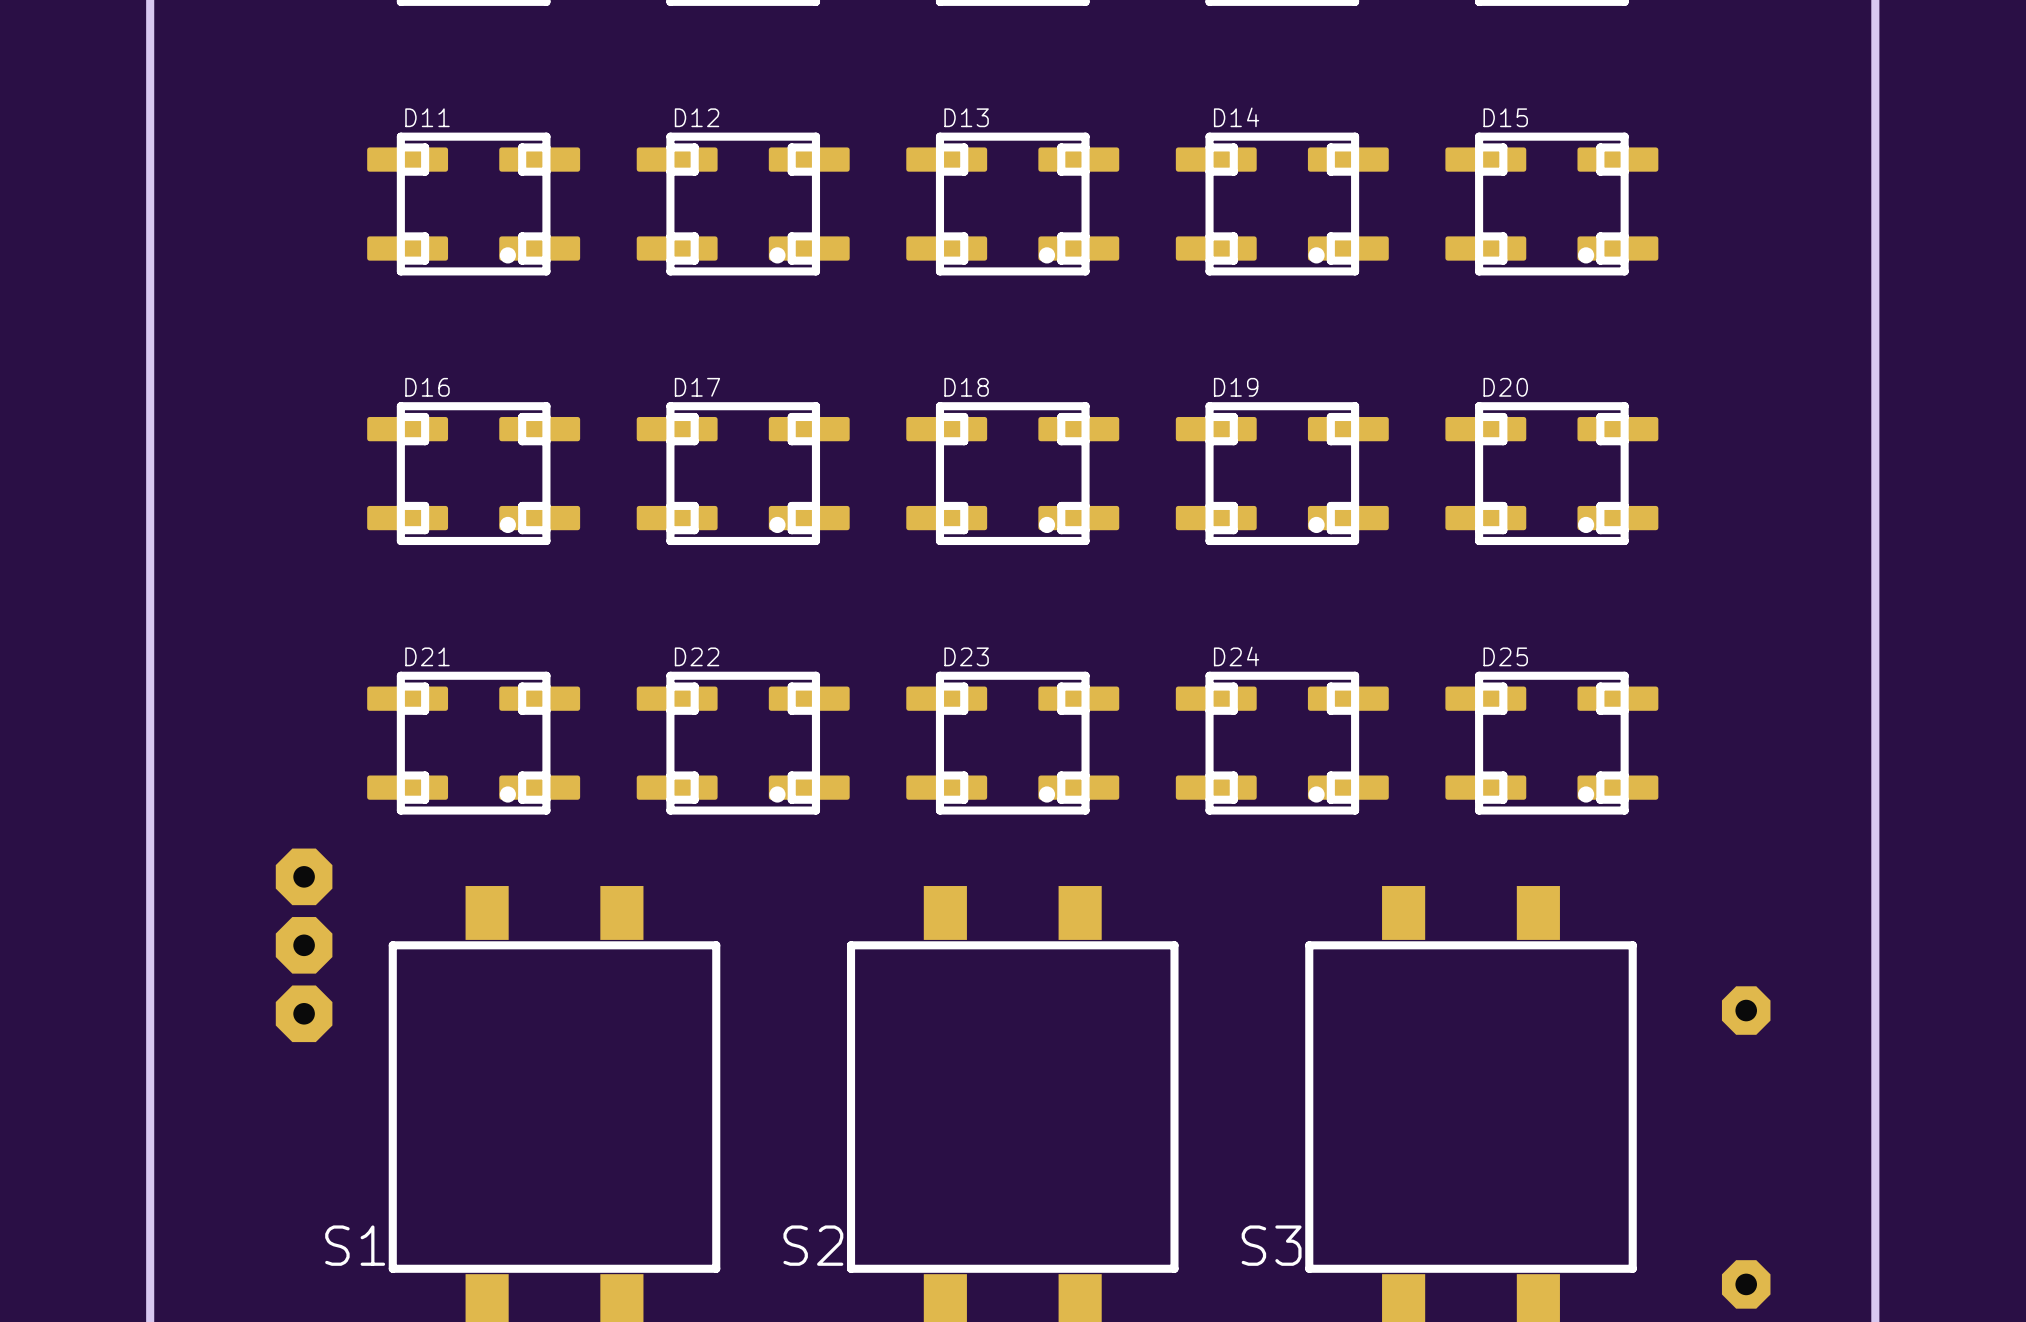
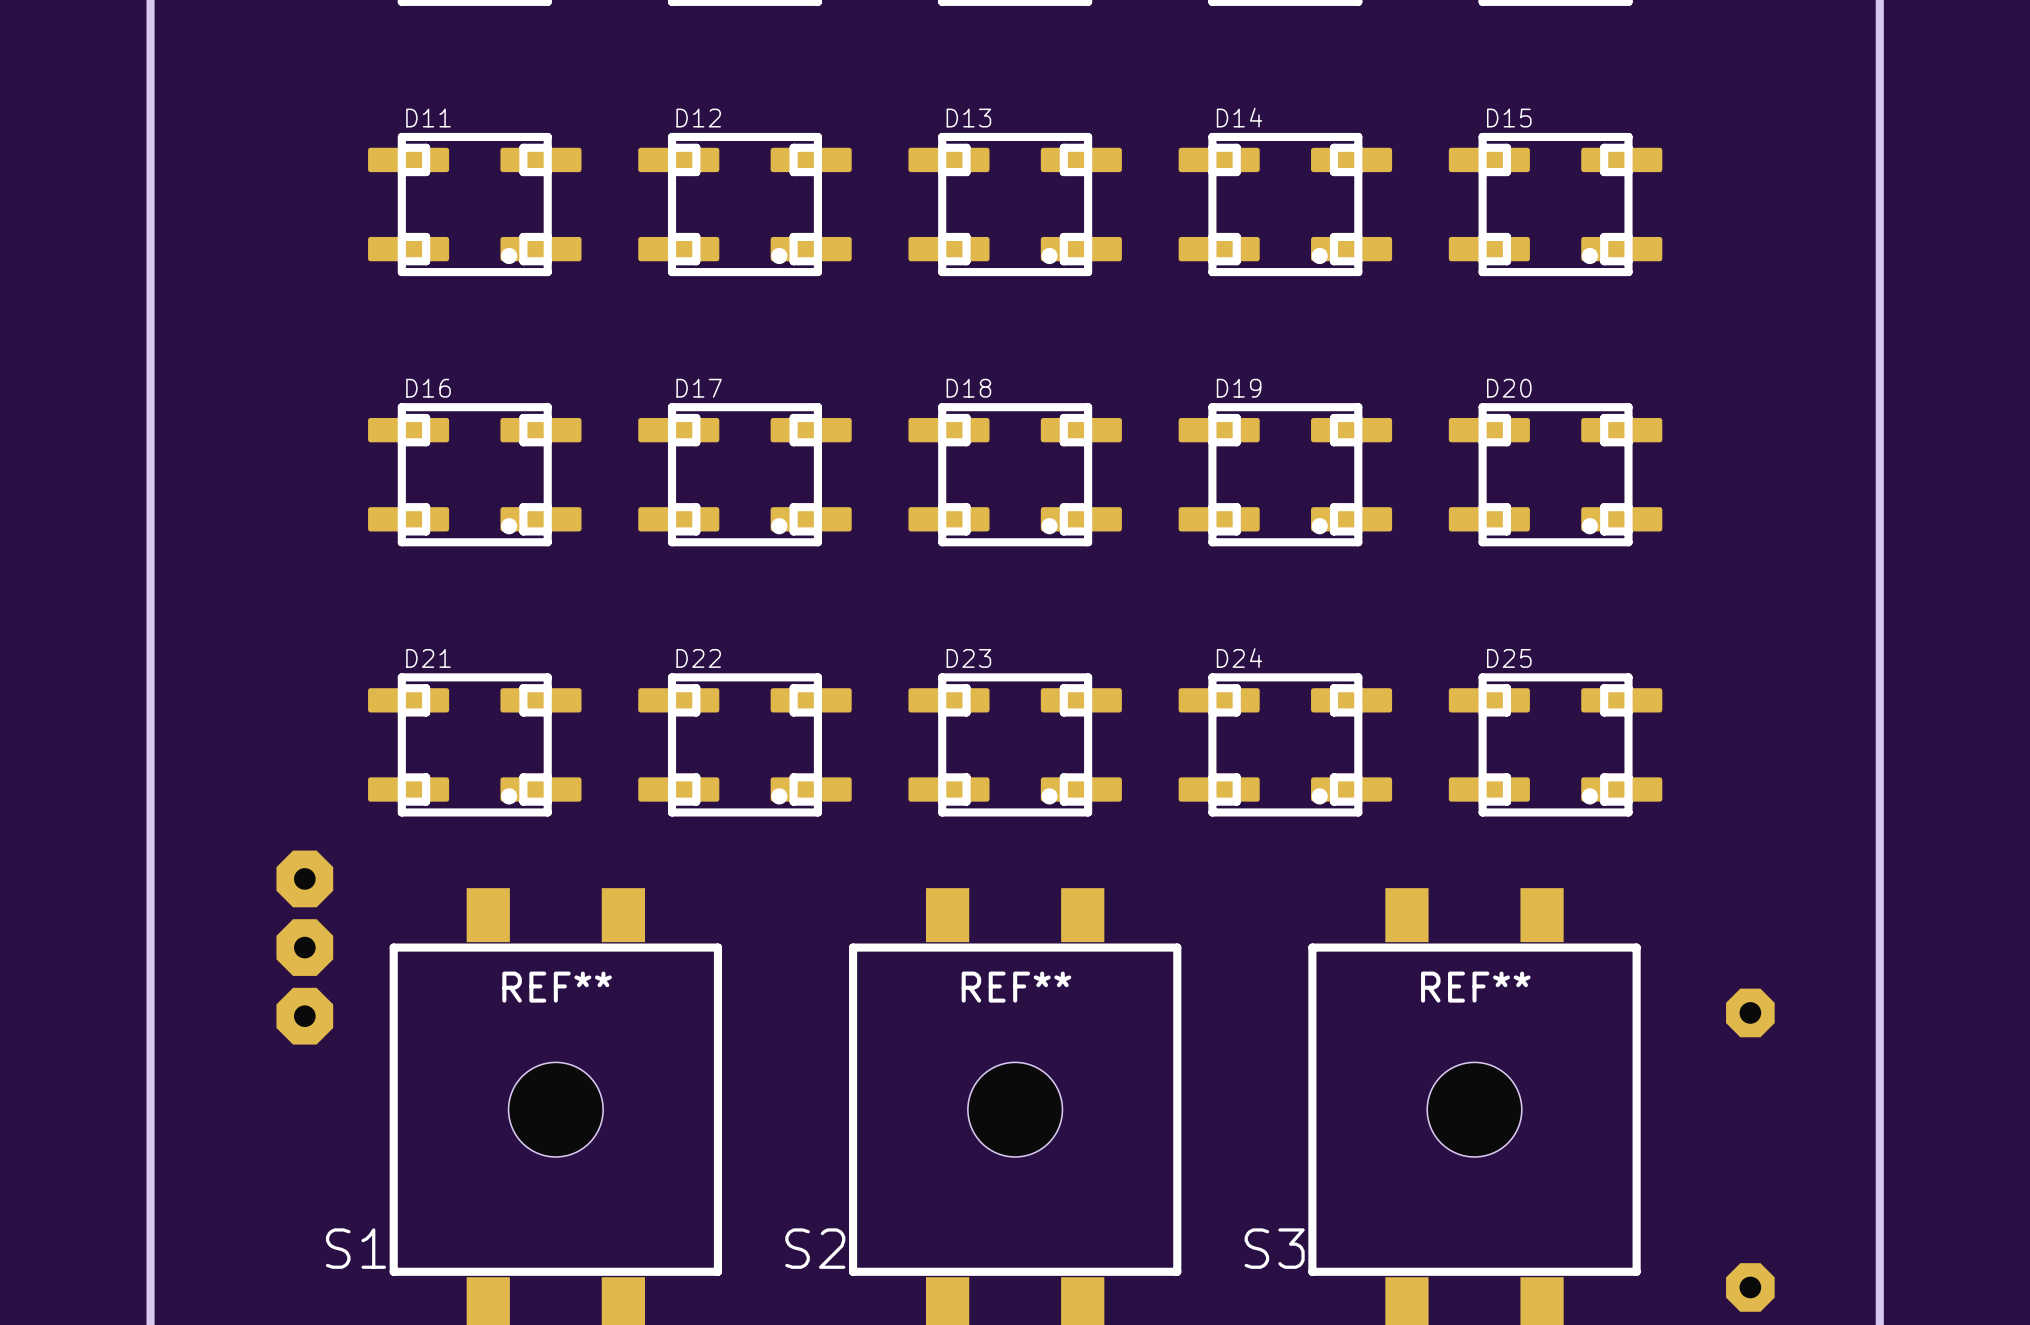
REF**: none -> (555, 1109)
REF**: none -> (1015, 1109)
REF**: none -> (1474, 1109)

